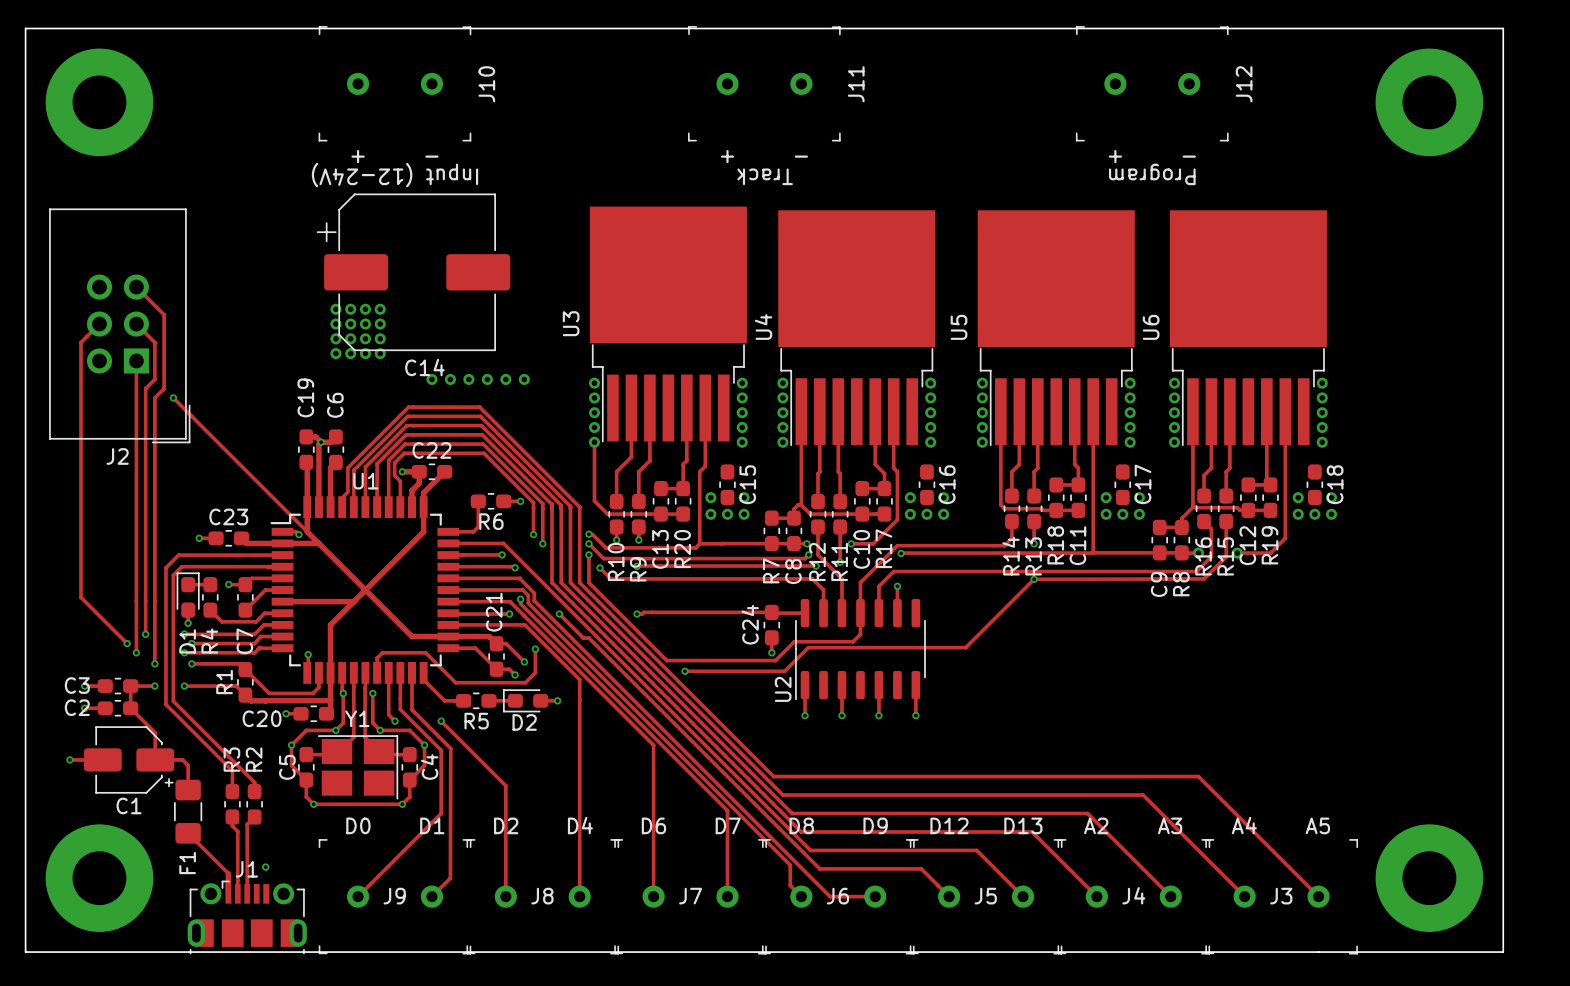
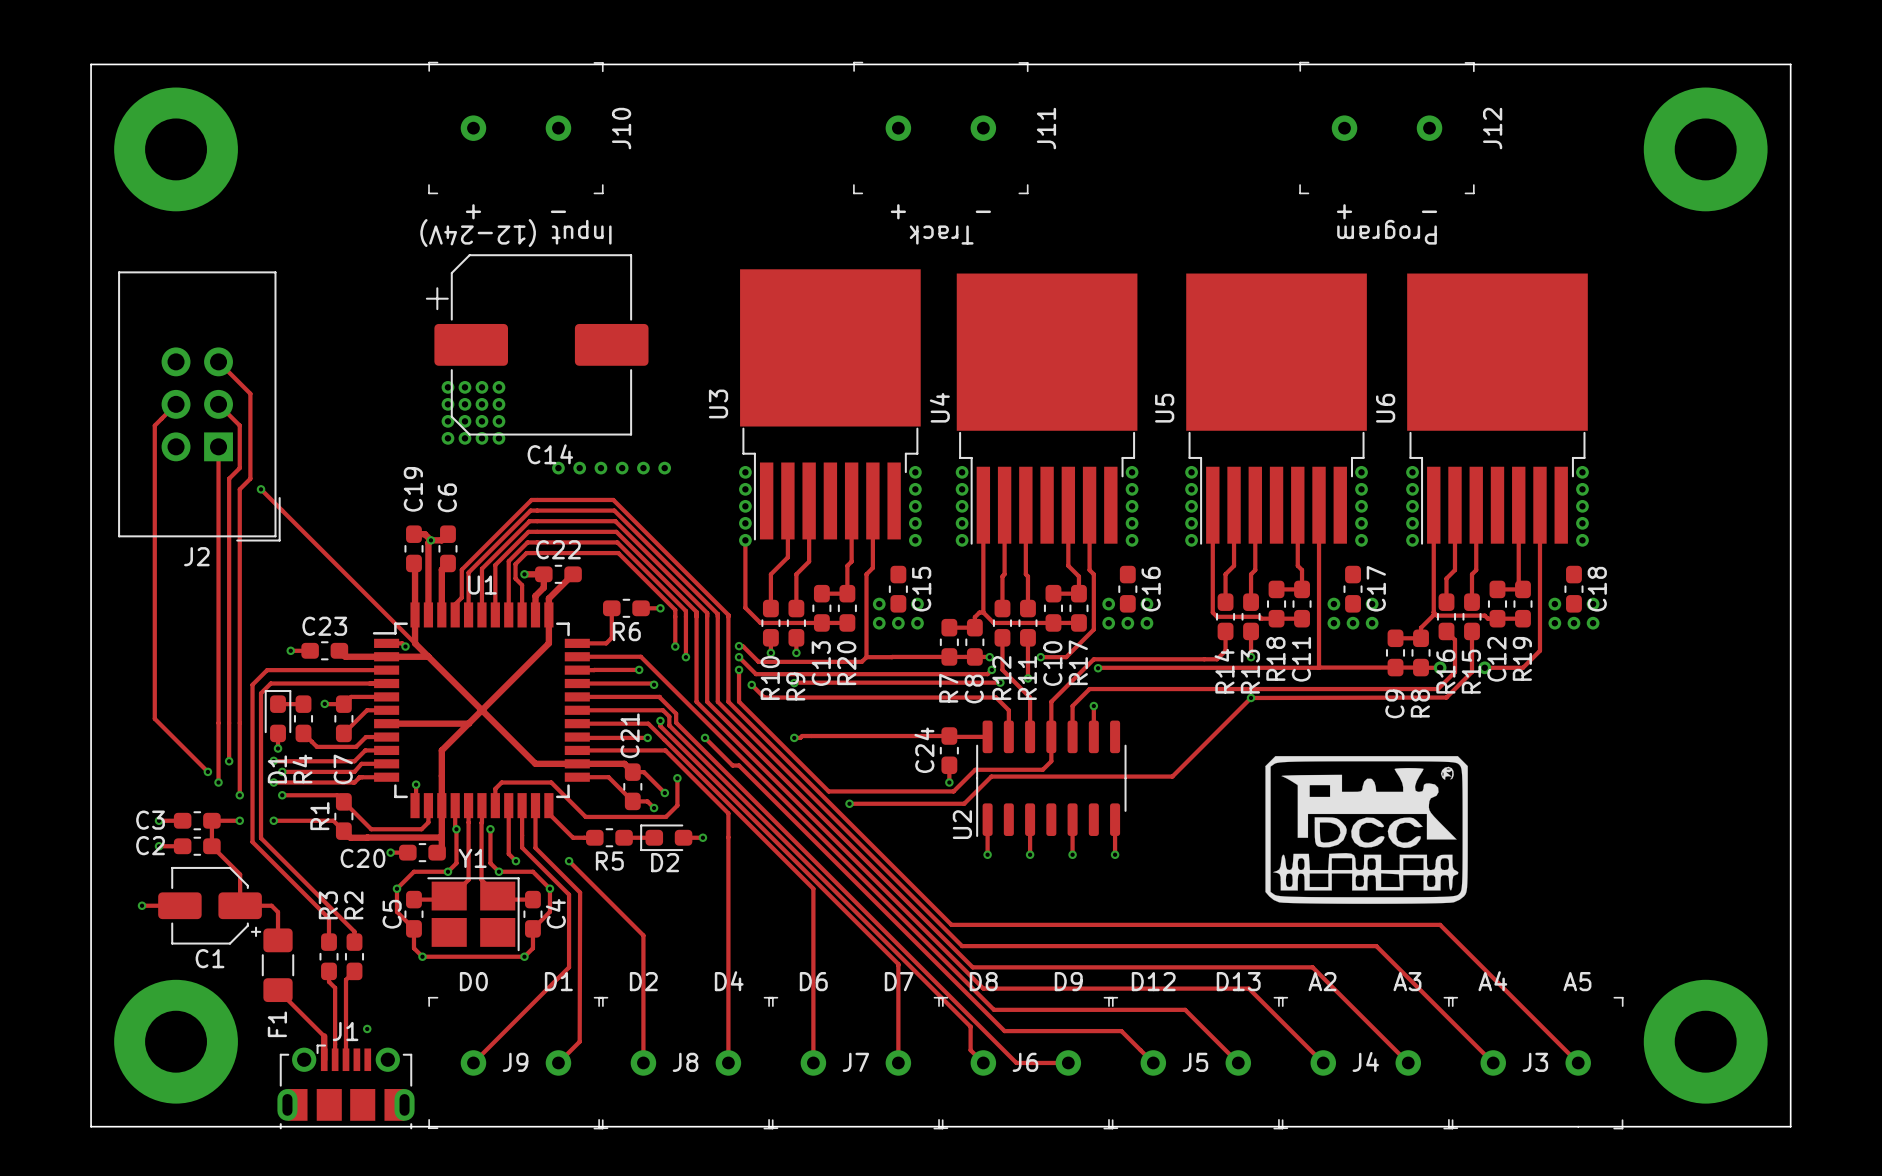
drawing: none -> [1265, 756, 1468, 904]

